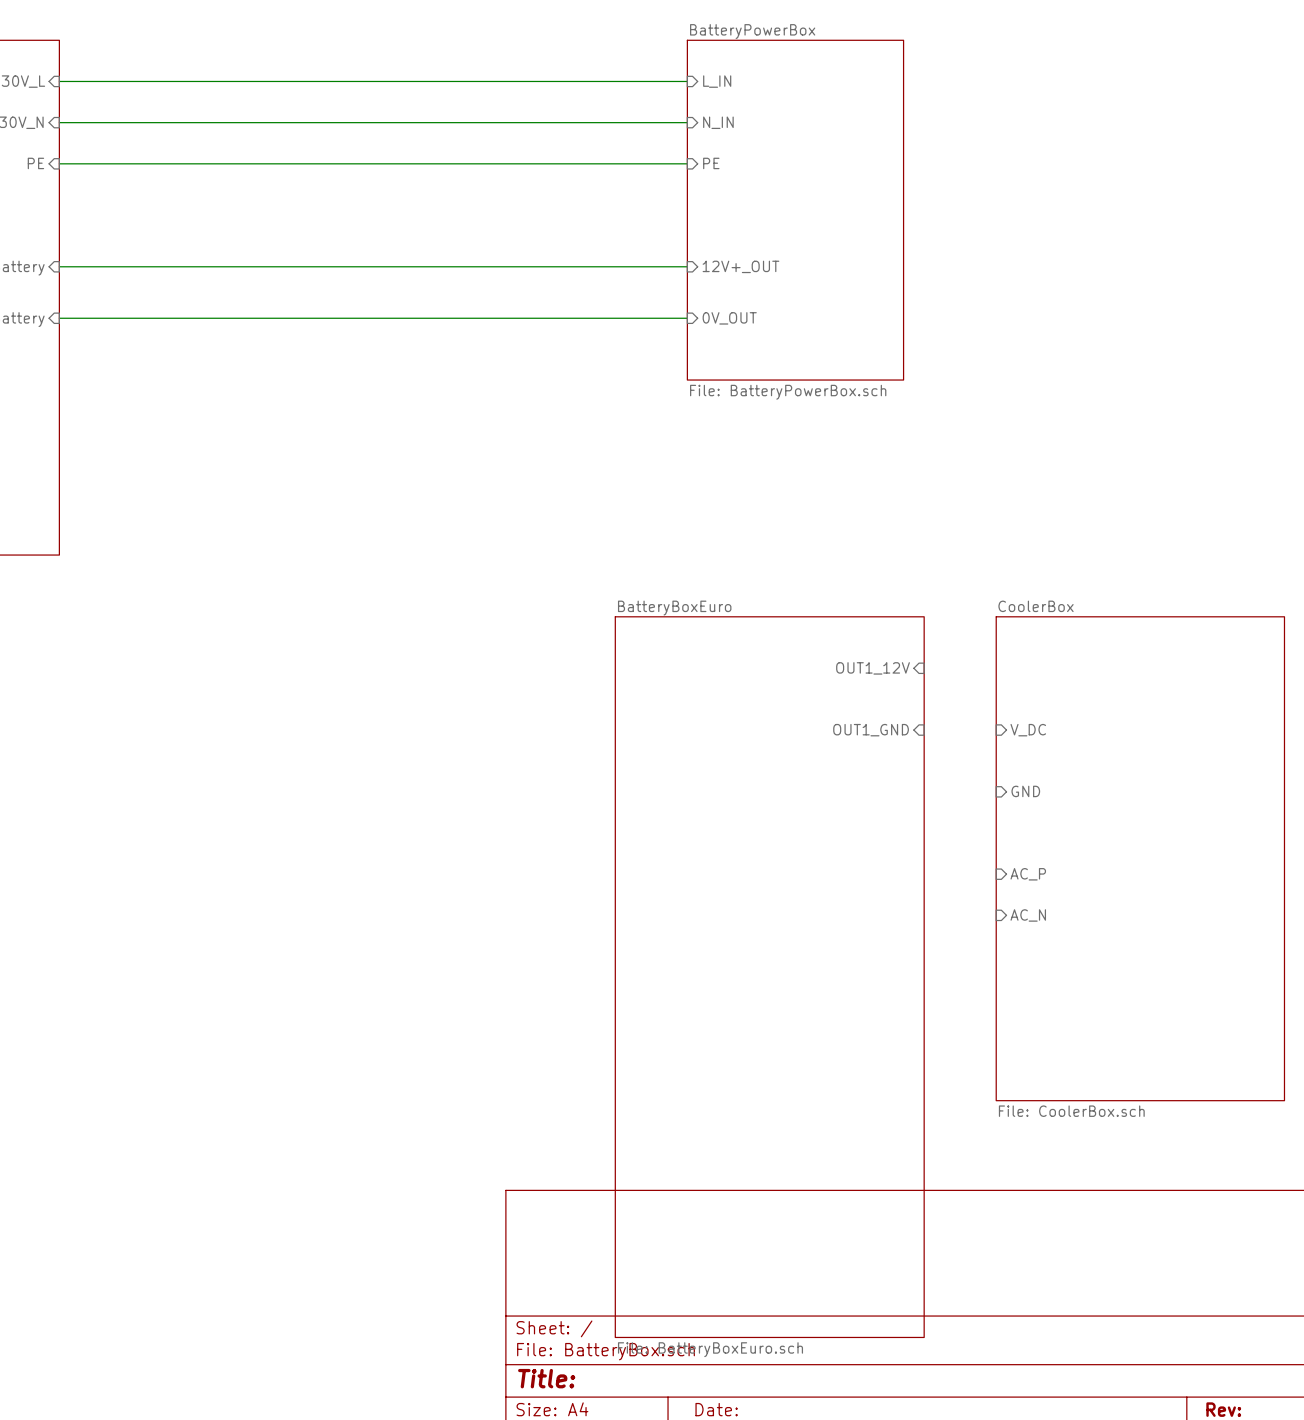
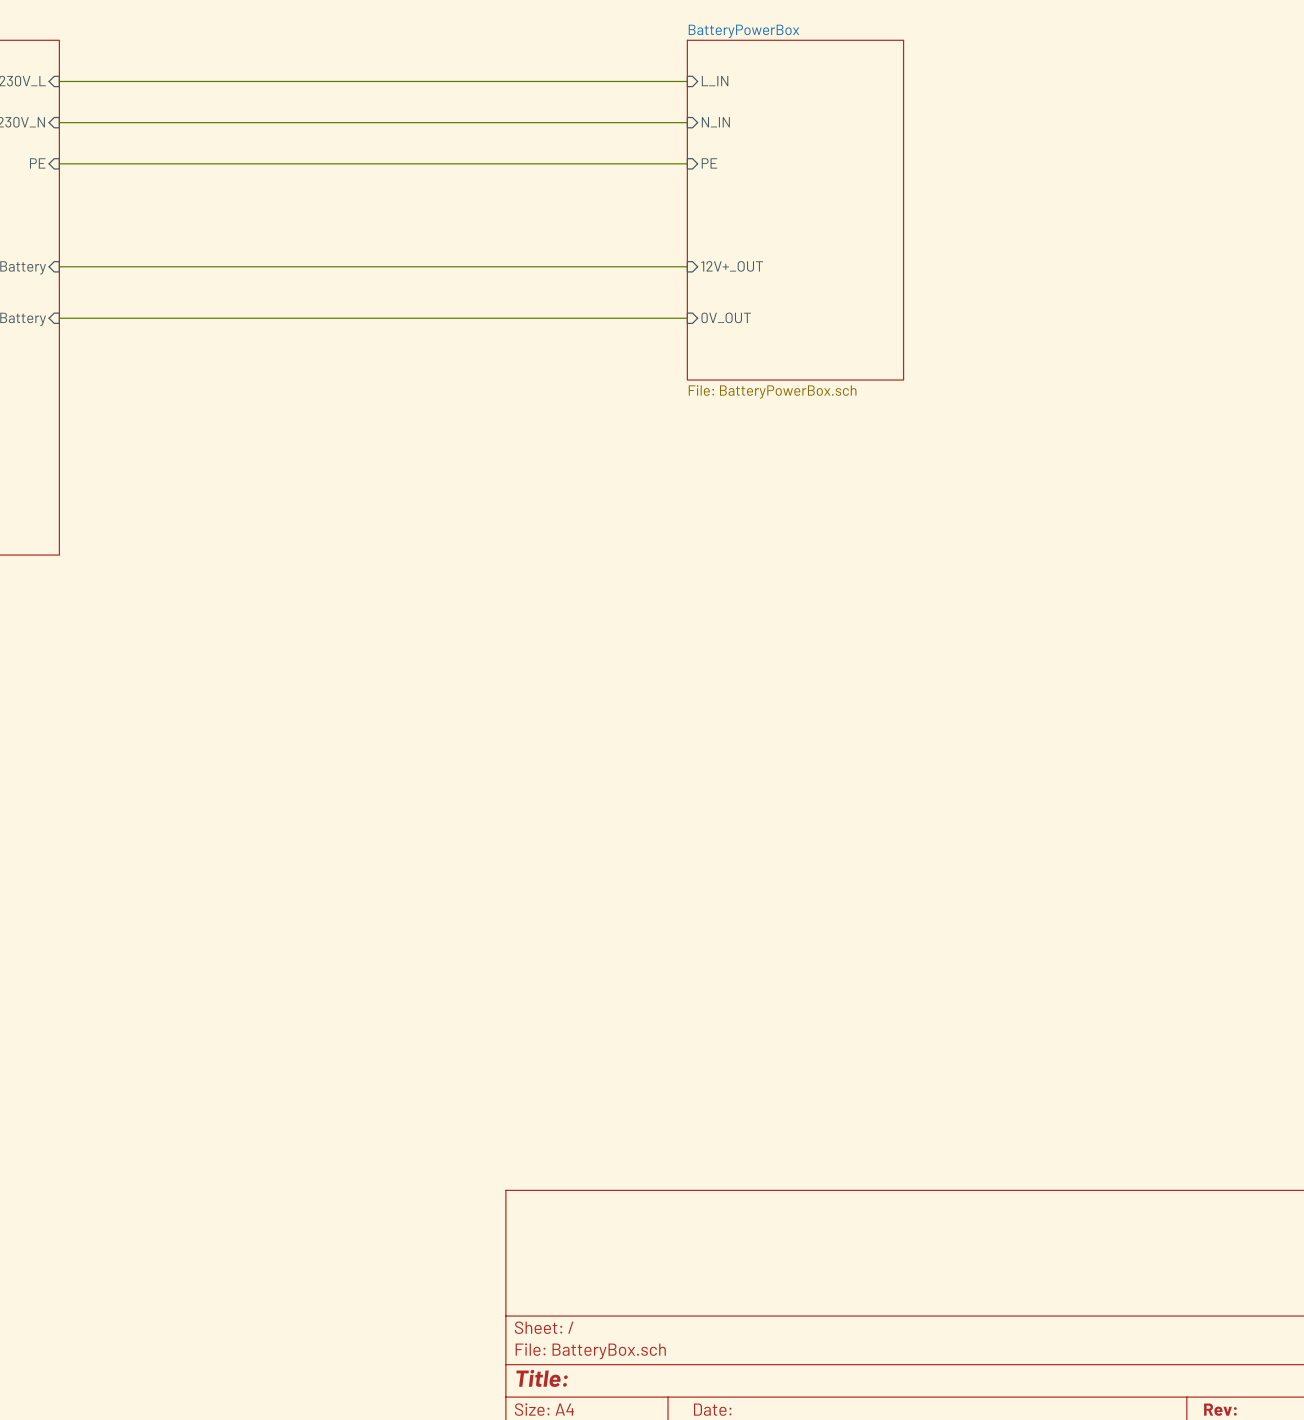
sheet pin: OUT1_12V (873, 668) -> none
sheet pin: OUT1_GND (871, 730) -> none
sheet pin: V_DC (1028, 730) -> none
sheet pin: GND (1025, 791) -> none
sheet CoolerBox: File: CoolerBox.sch (1140, 858) -> none
sheet pin: AC_P (1028, 874) -> none
sheet pin: AC_N (1028, 915) -> none
sheet BatteryBoxEuro: File: BatteryBoxEuro.sch (769, 977) -> none

